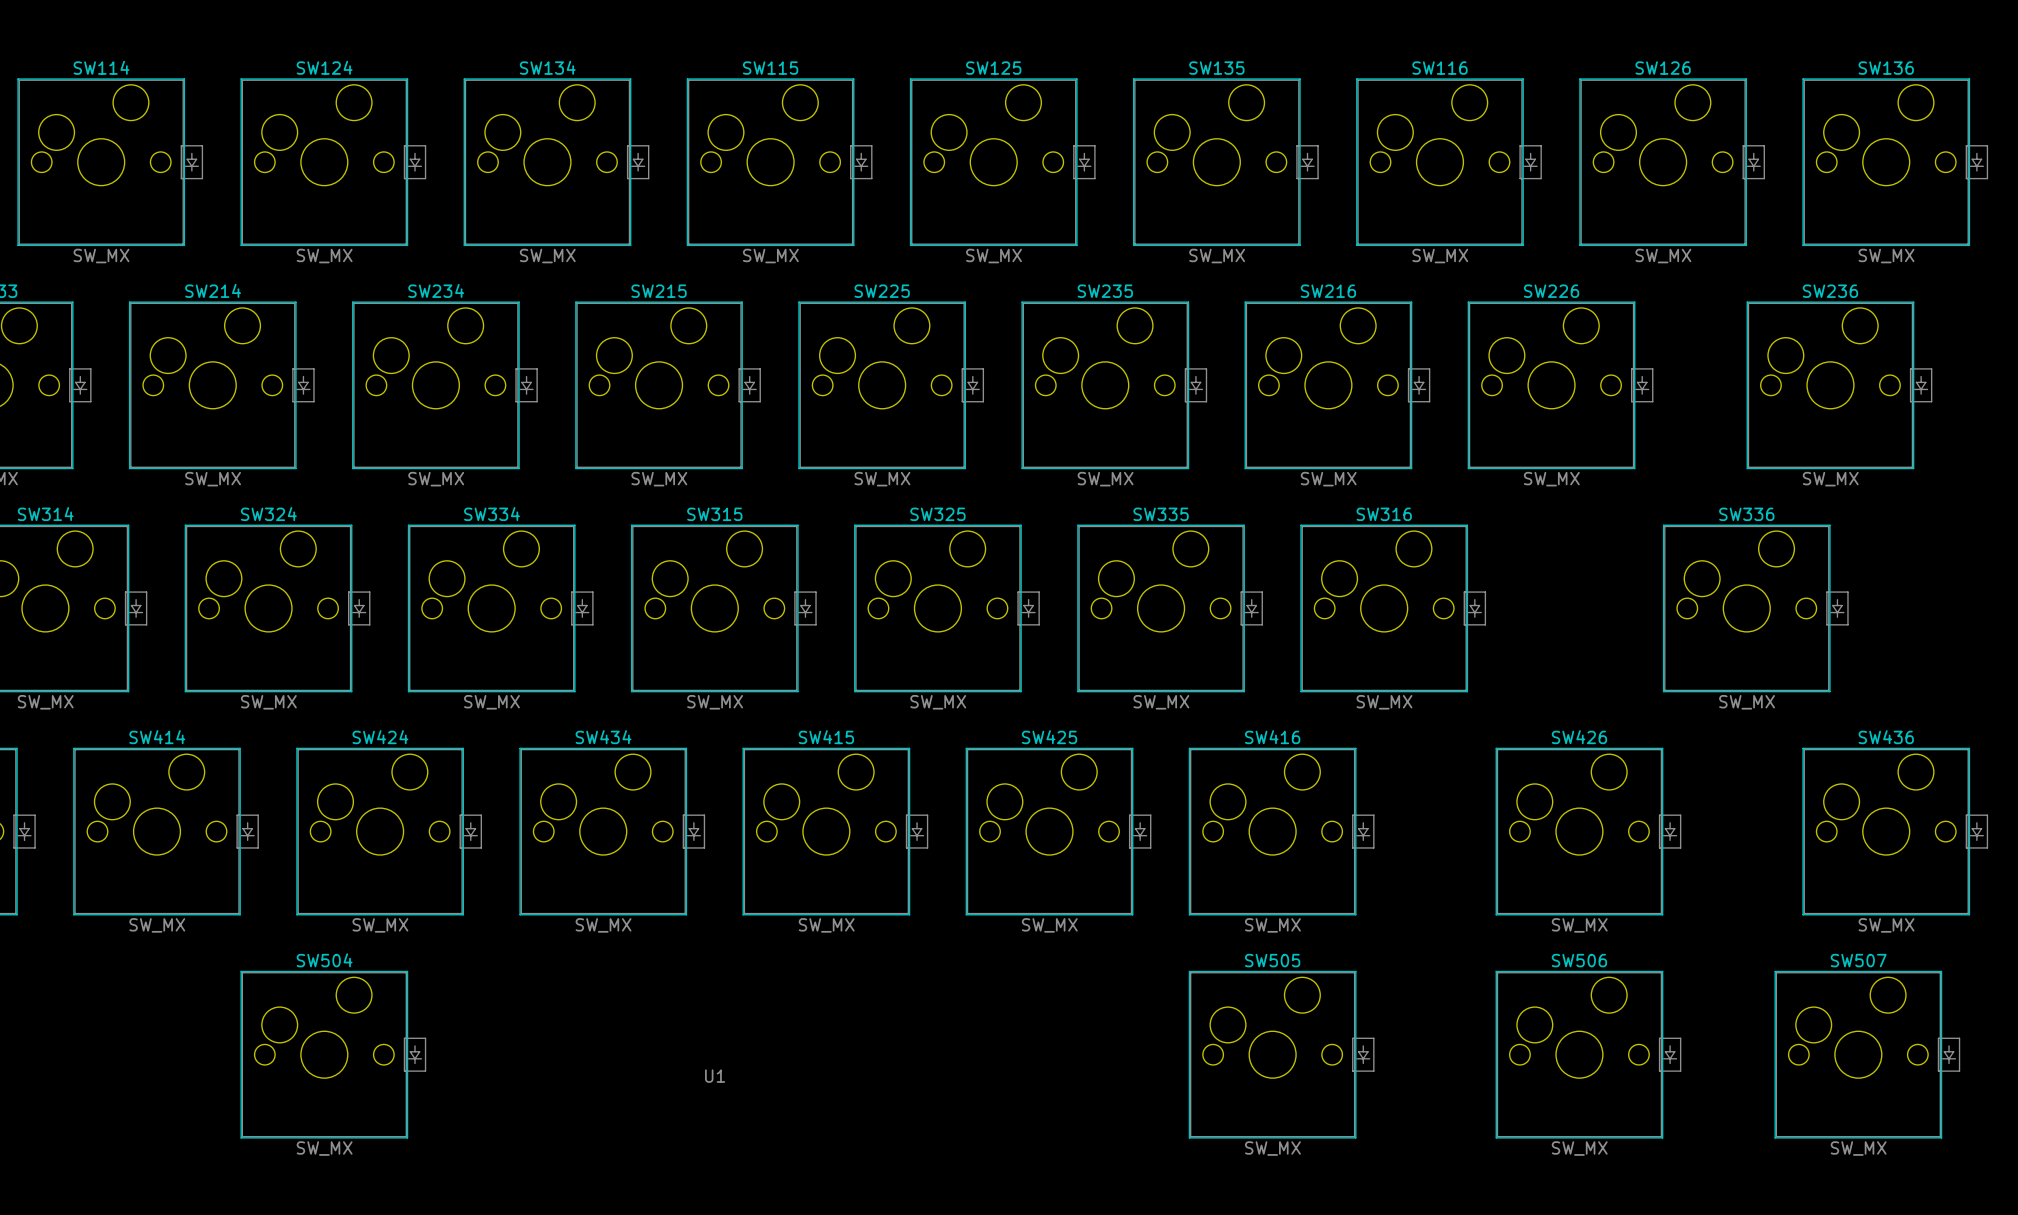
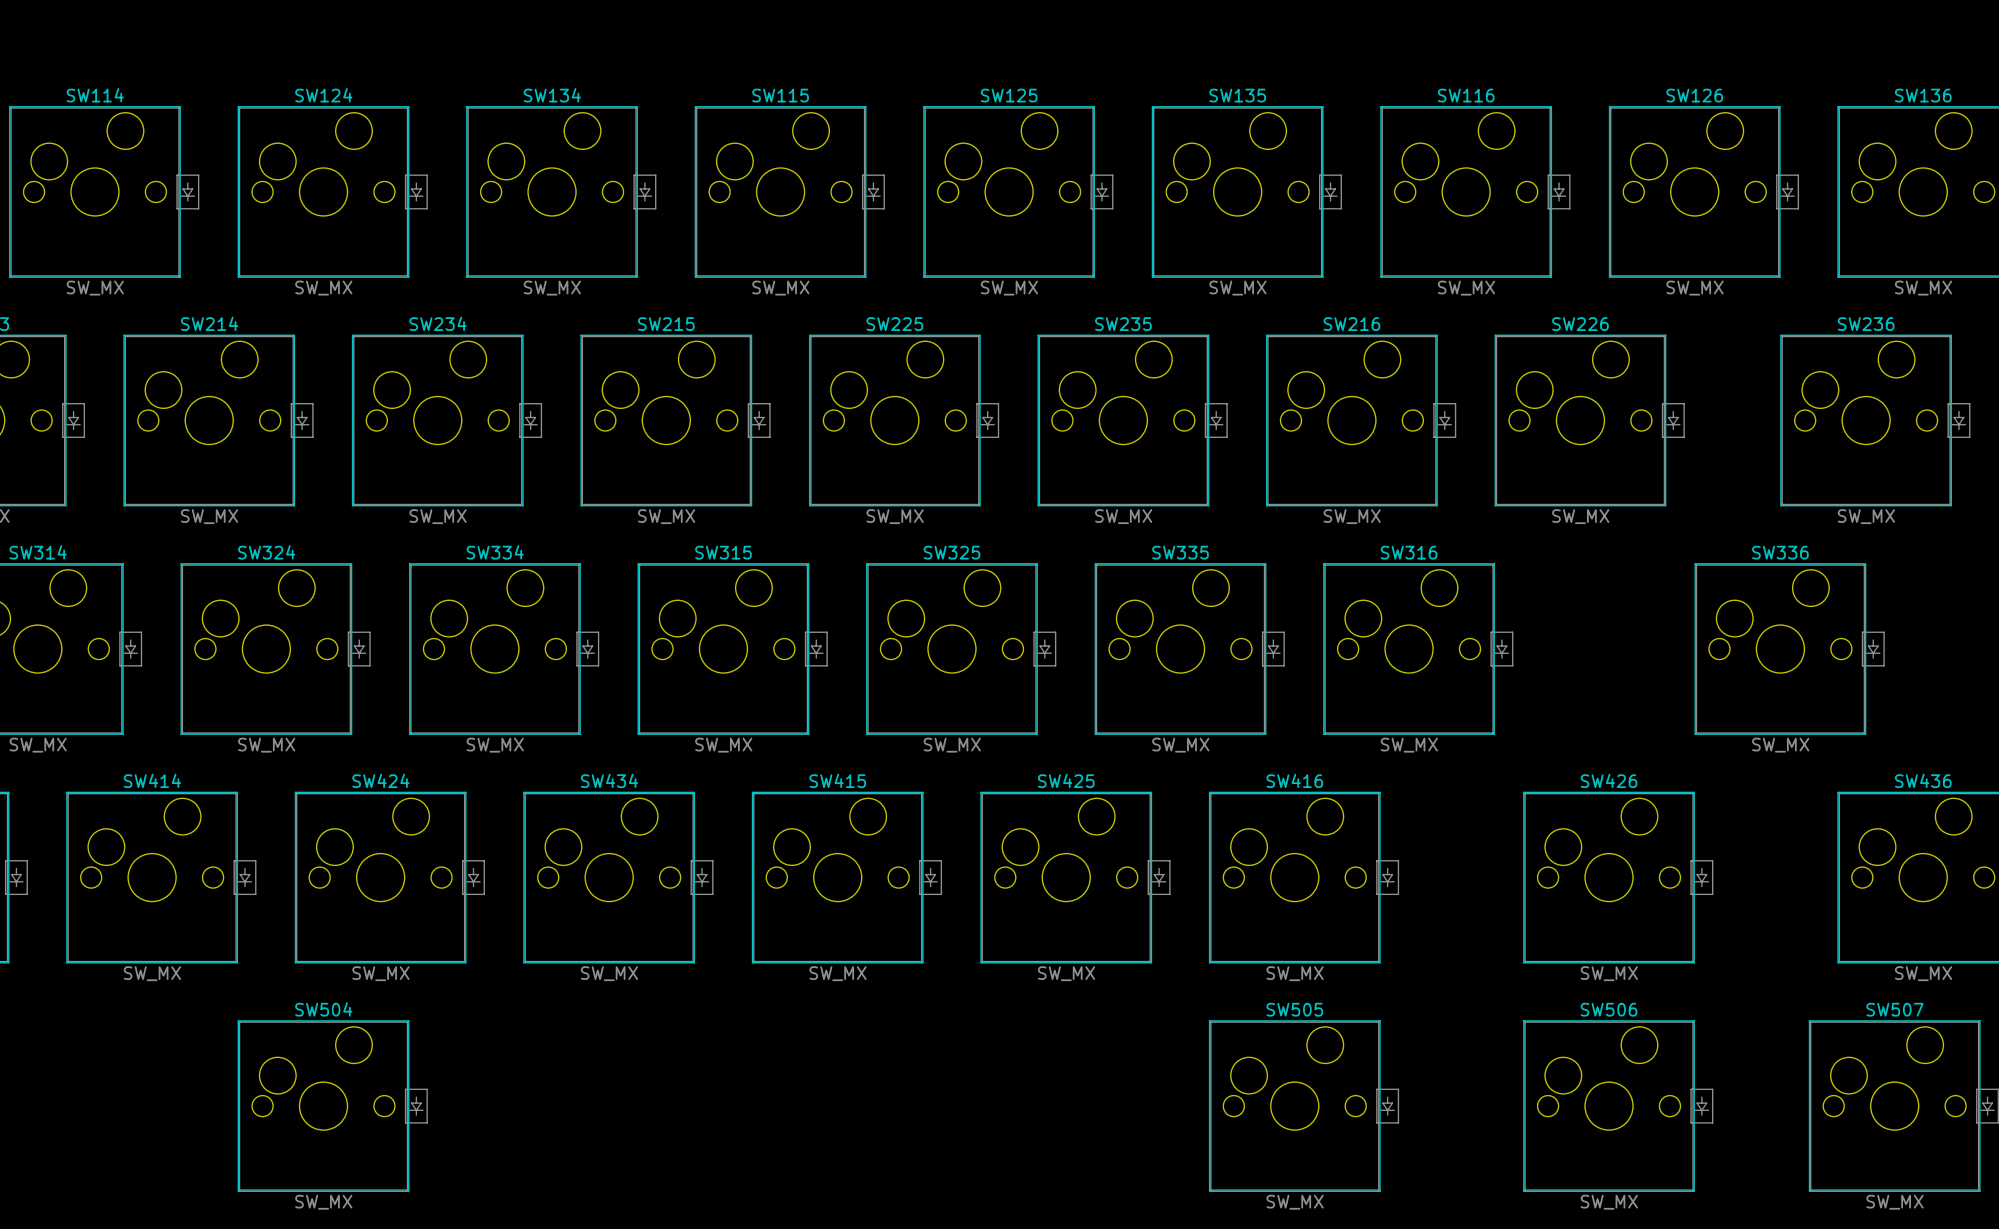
U1: (715, 1076) -> none

